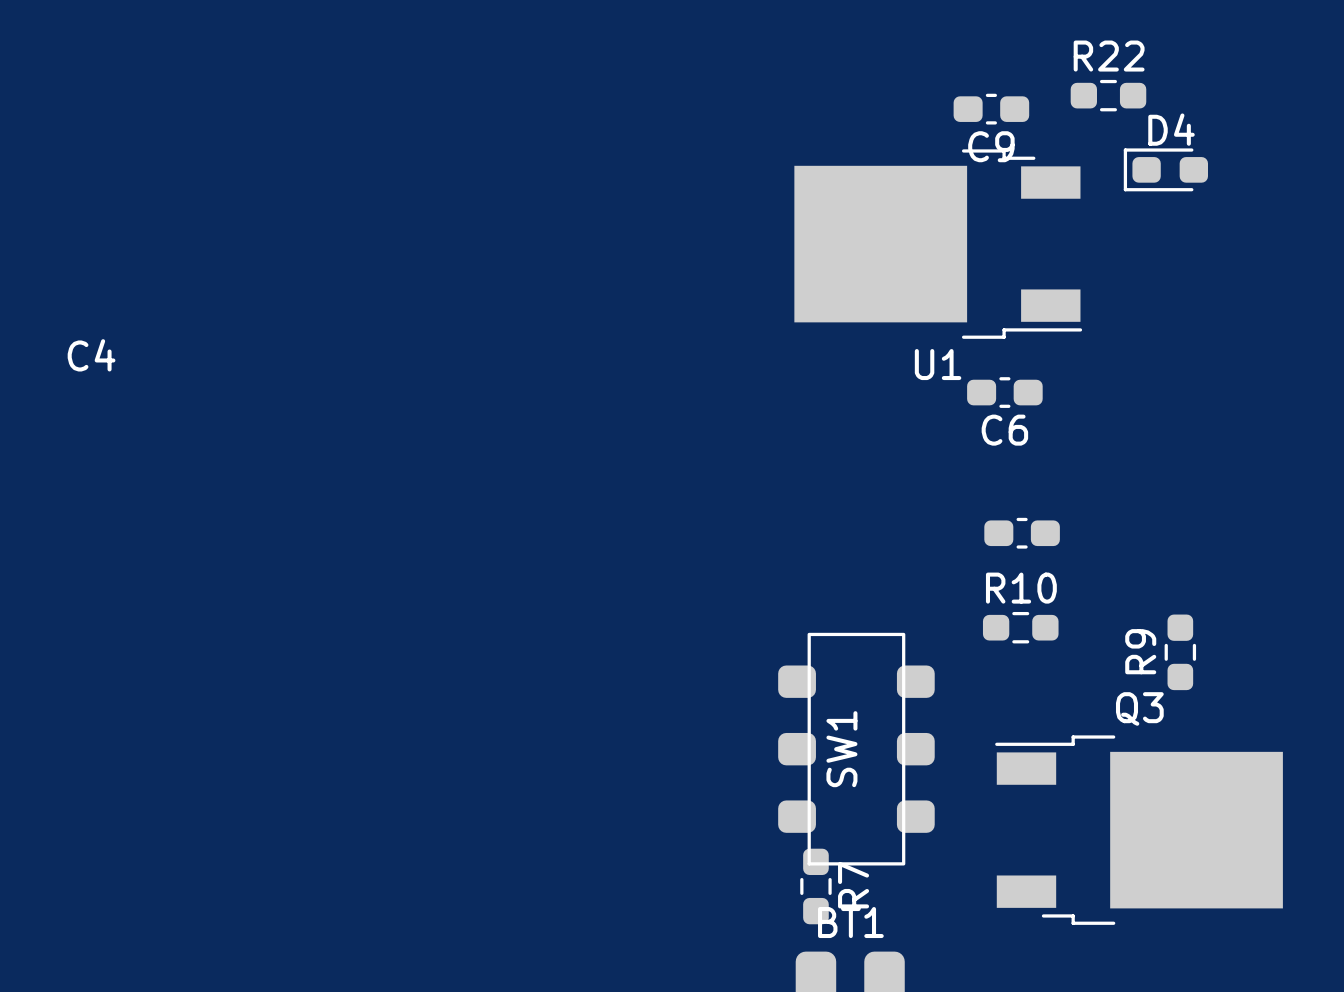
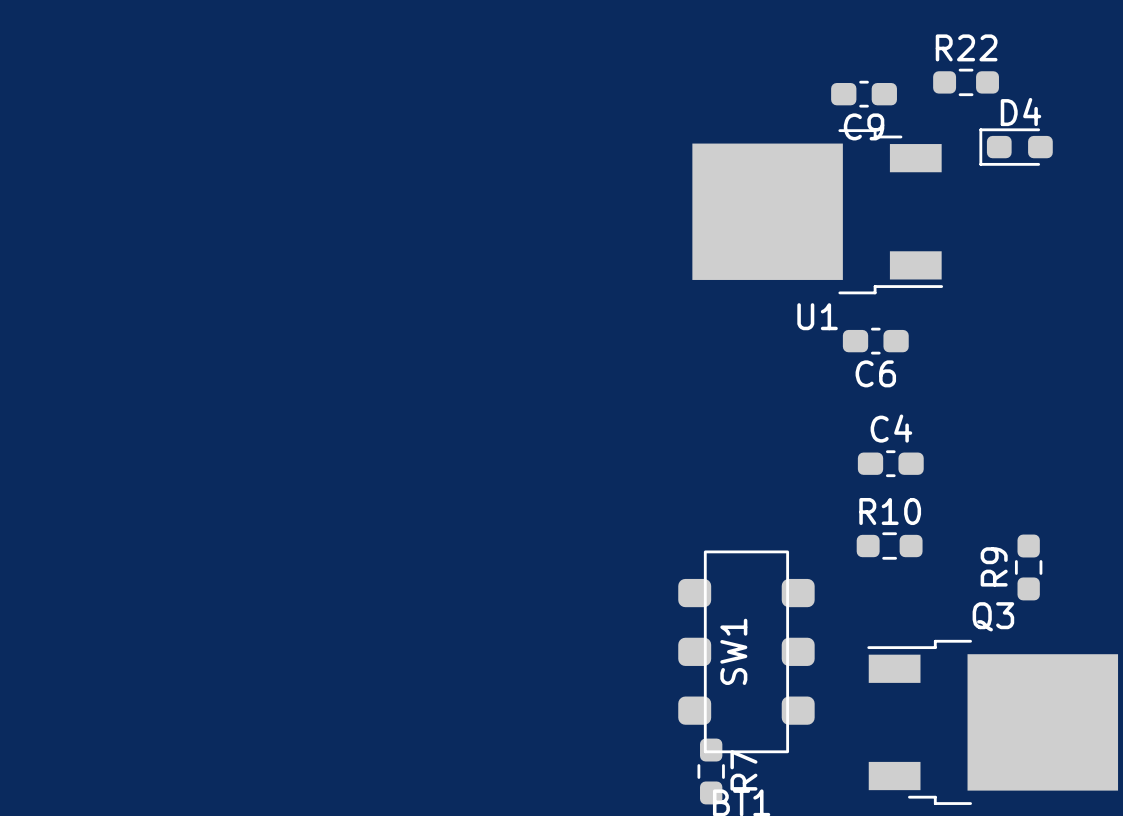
C4 name position: C4 (91, 355) -> C4 (891, 428)

